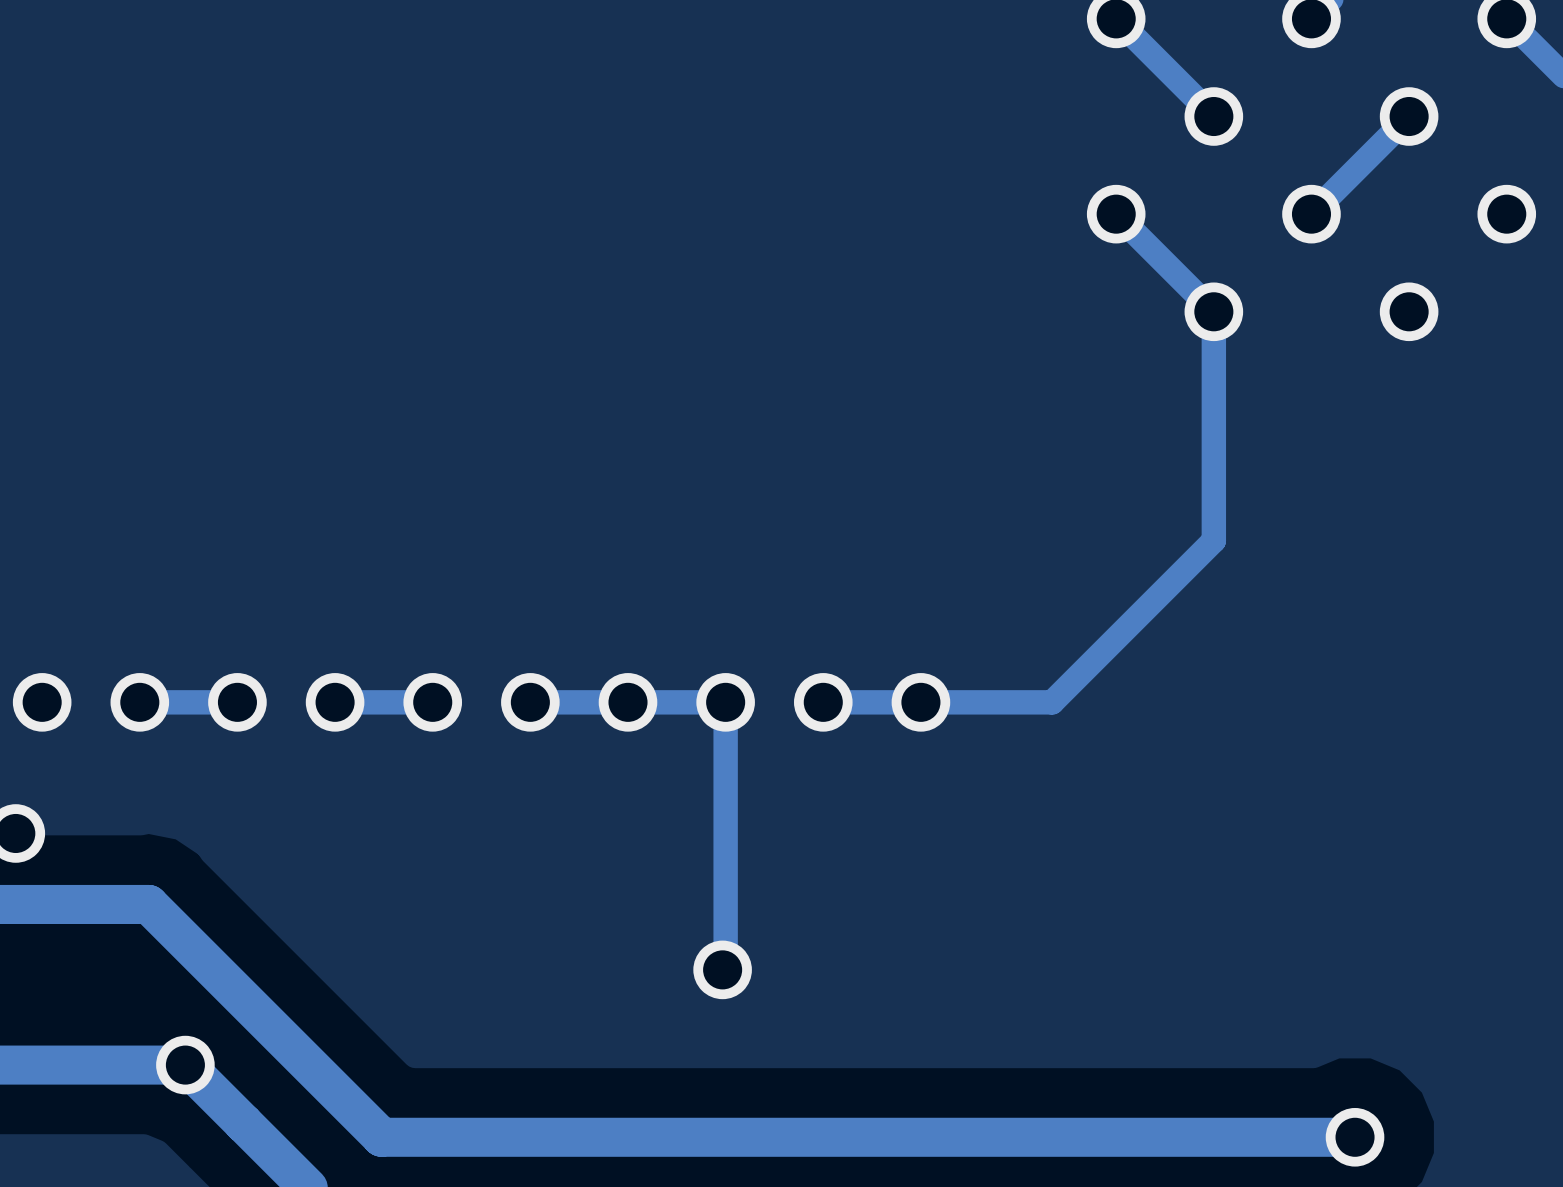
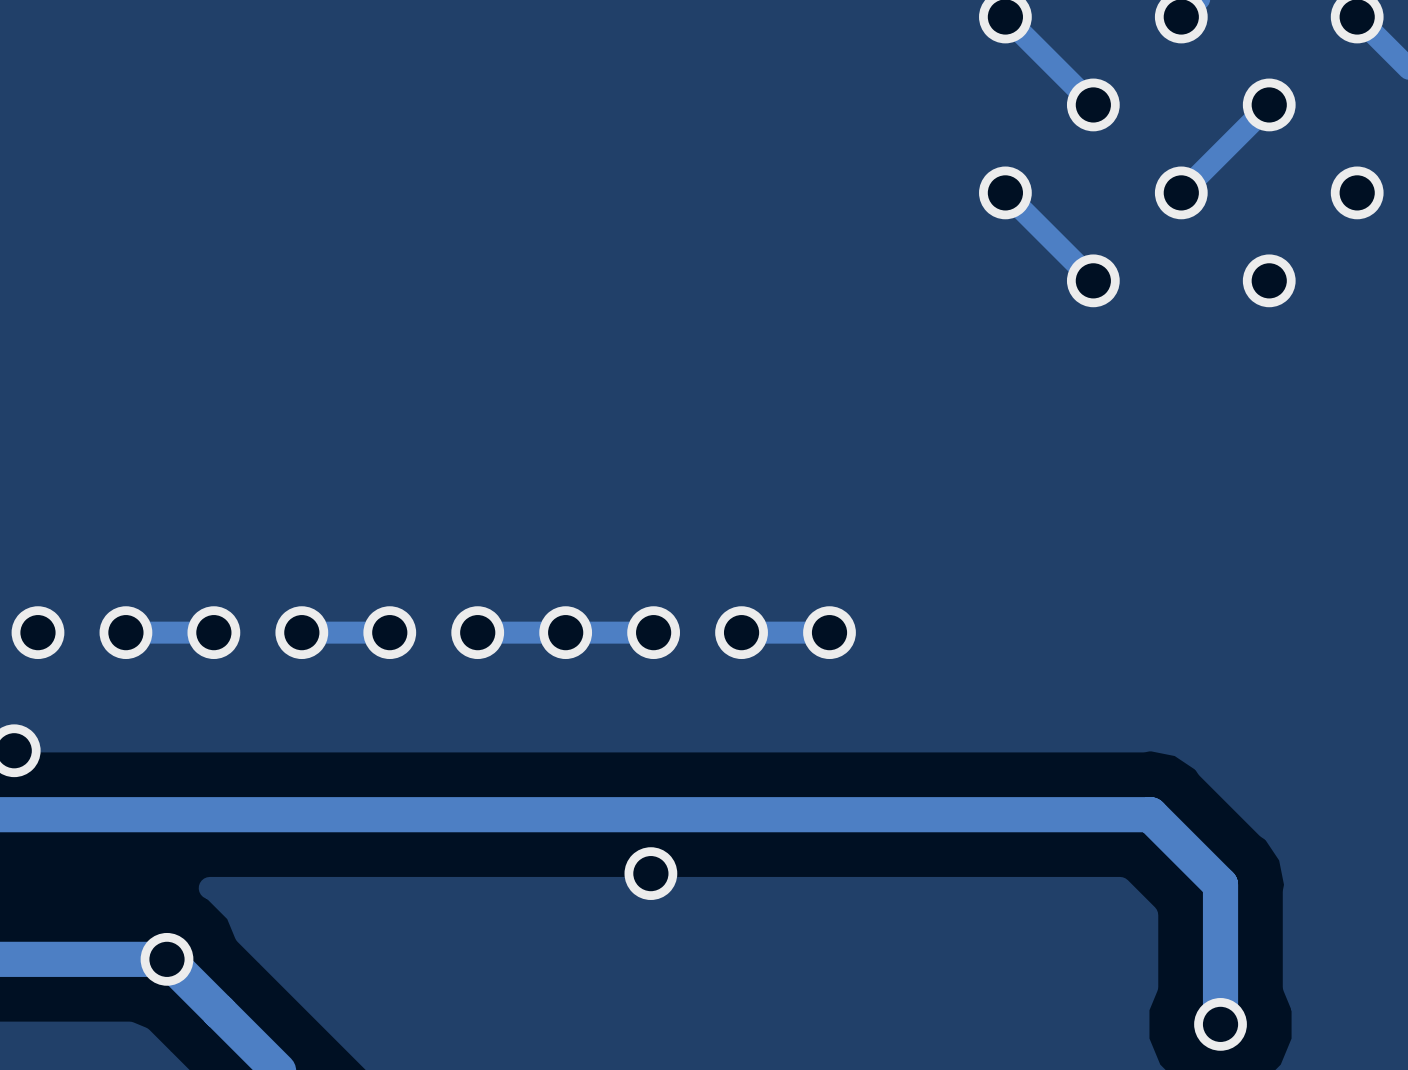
track: (1213, 311) (1213, 540) (1052, 702) (920, 702) -> none
track: (725, 702) (725, 966) (722, 969) -> none
track: (148, 904) (381, 1137) (1355, 1137) -> (134, 814) (1150, 814) (1220, 884) (1220, 1024)

